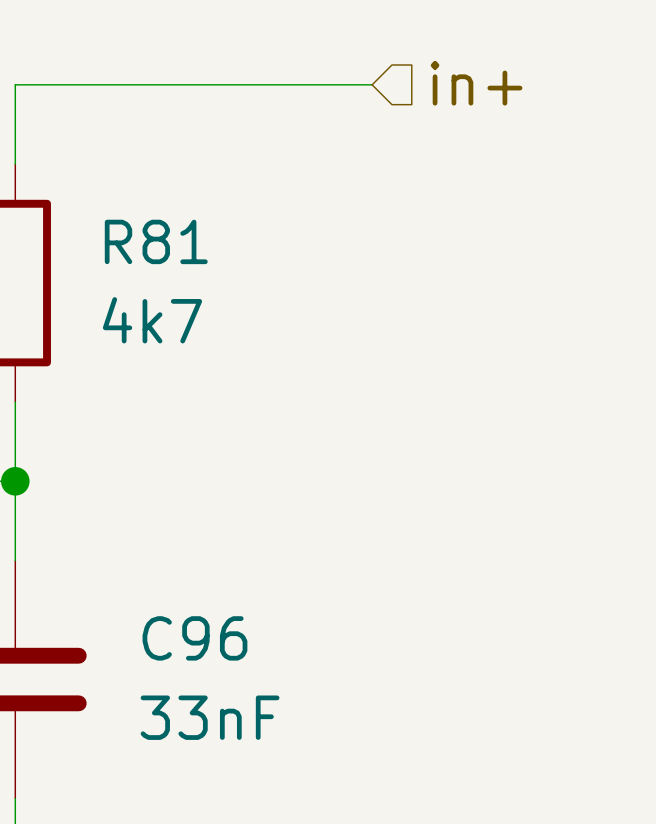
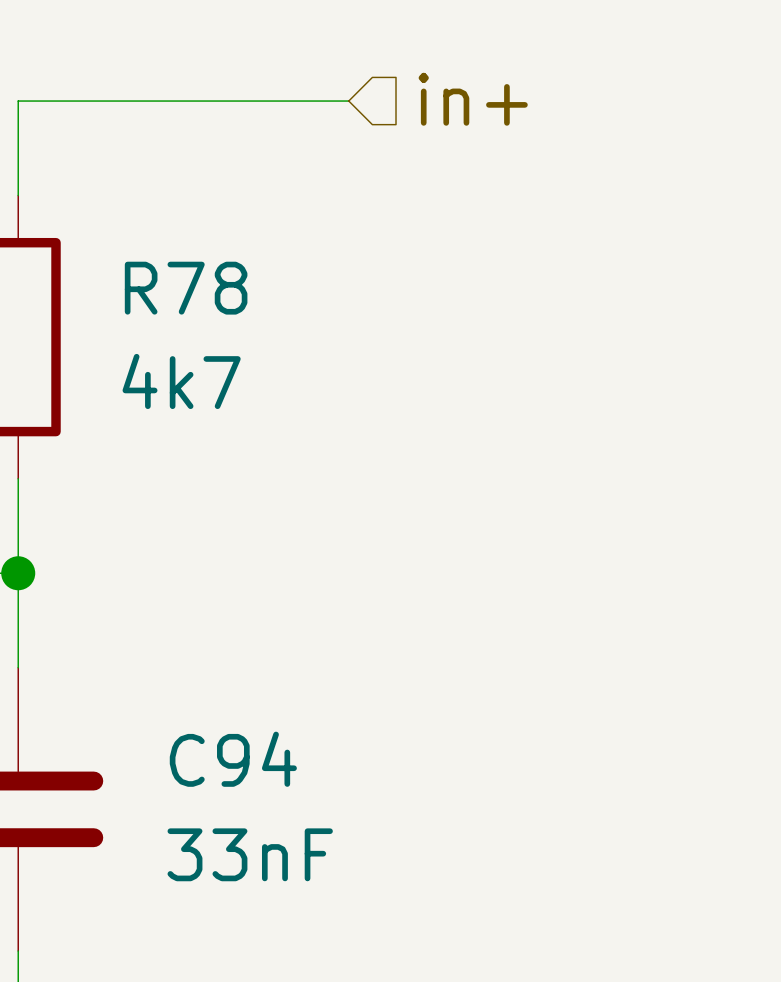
hierarchical label position: in+ (476, 83) -> in+ (473, 99)
wire: (292, 84) (372, 84) -> none
R81 name: R81 (156, 241) -> R78 (186, 288)
C96 name: C96 (194, 638) -> C94 (233, 759)

